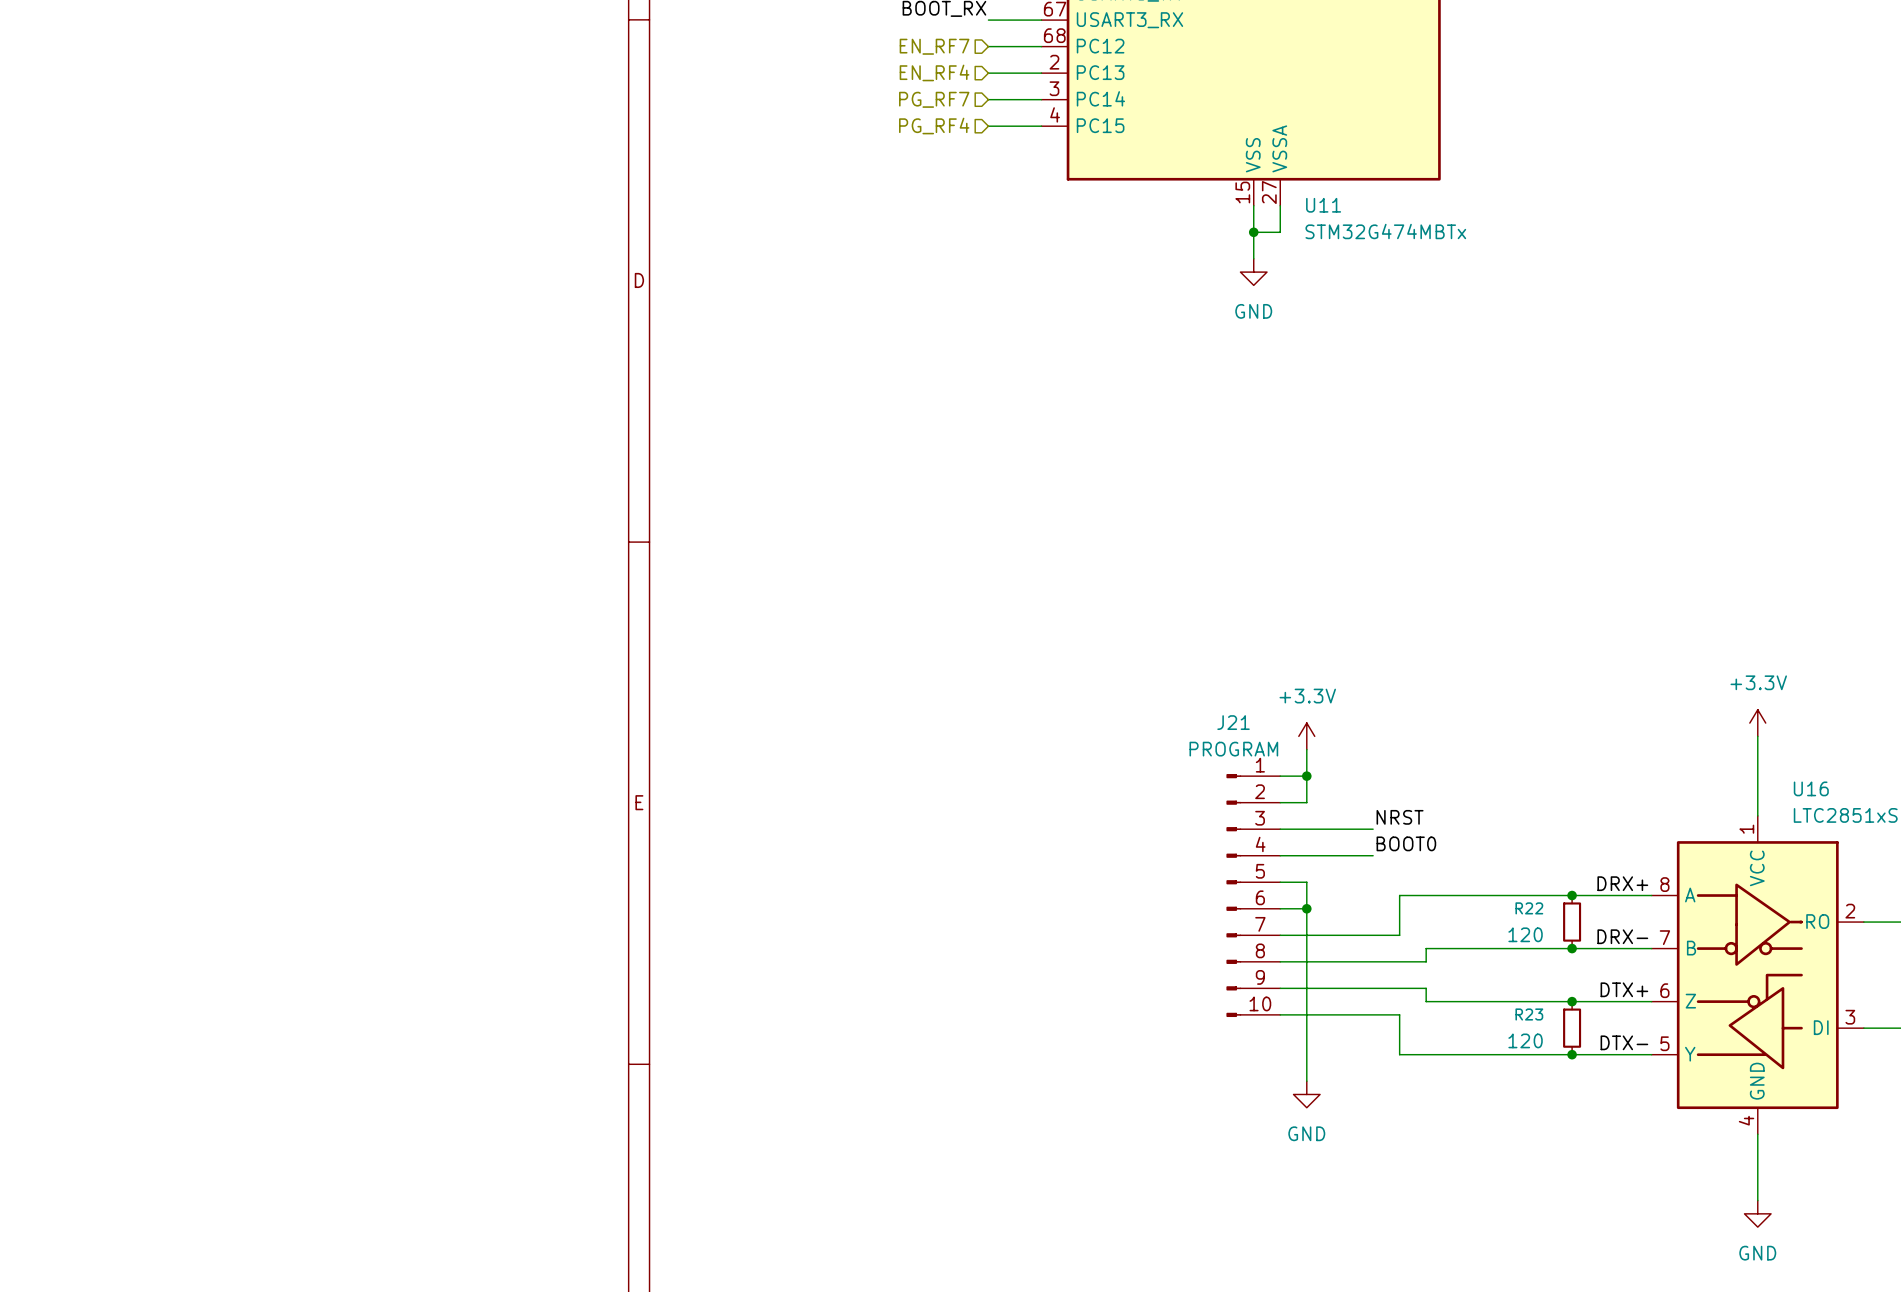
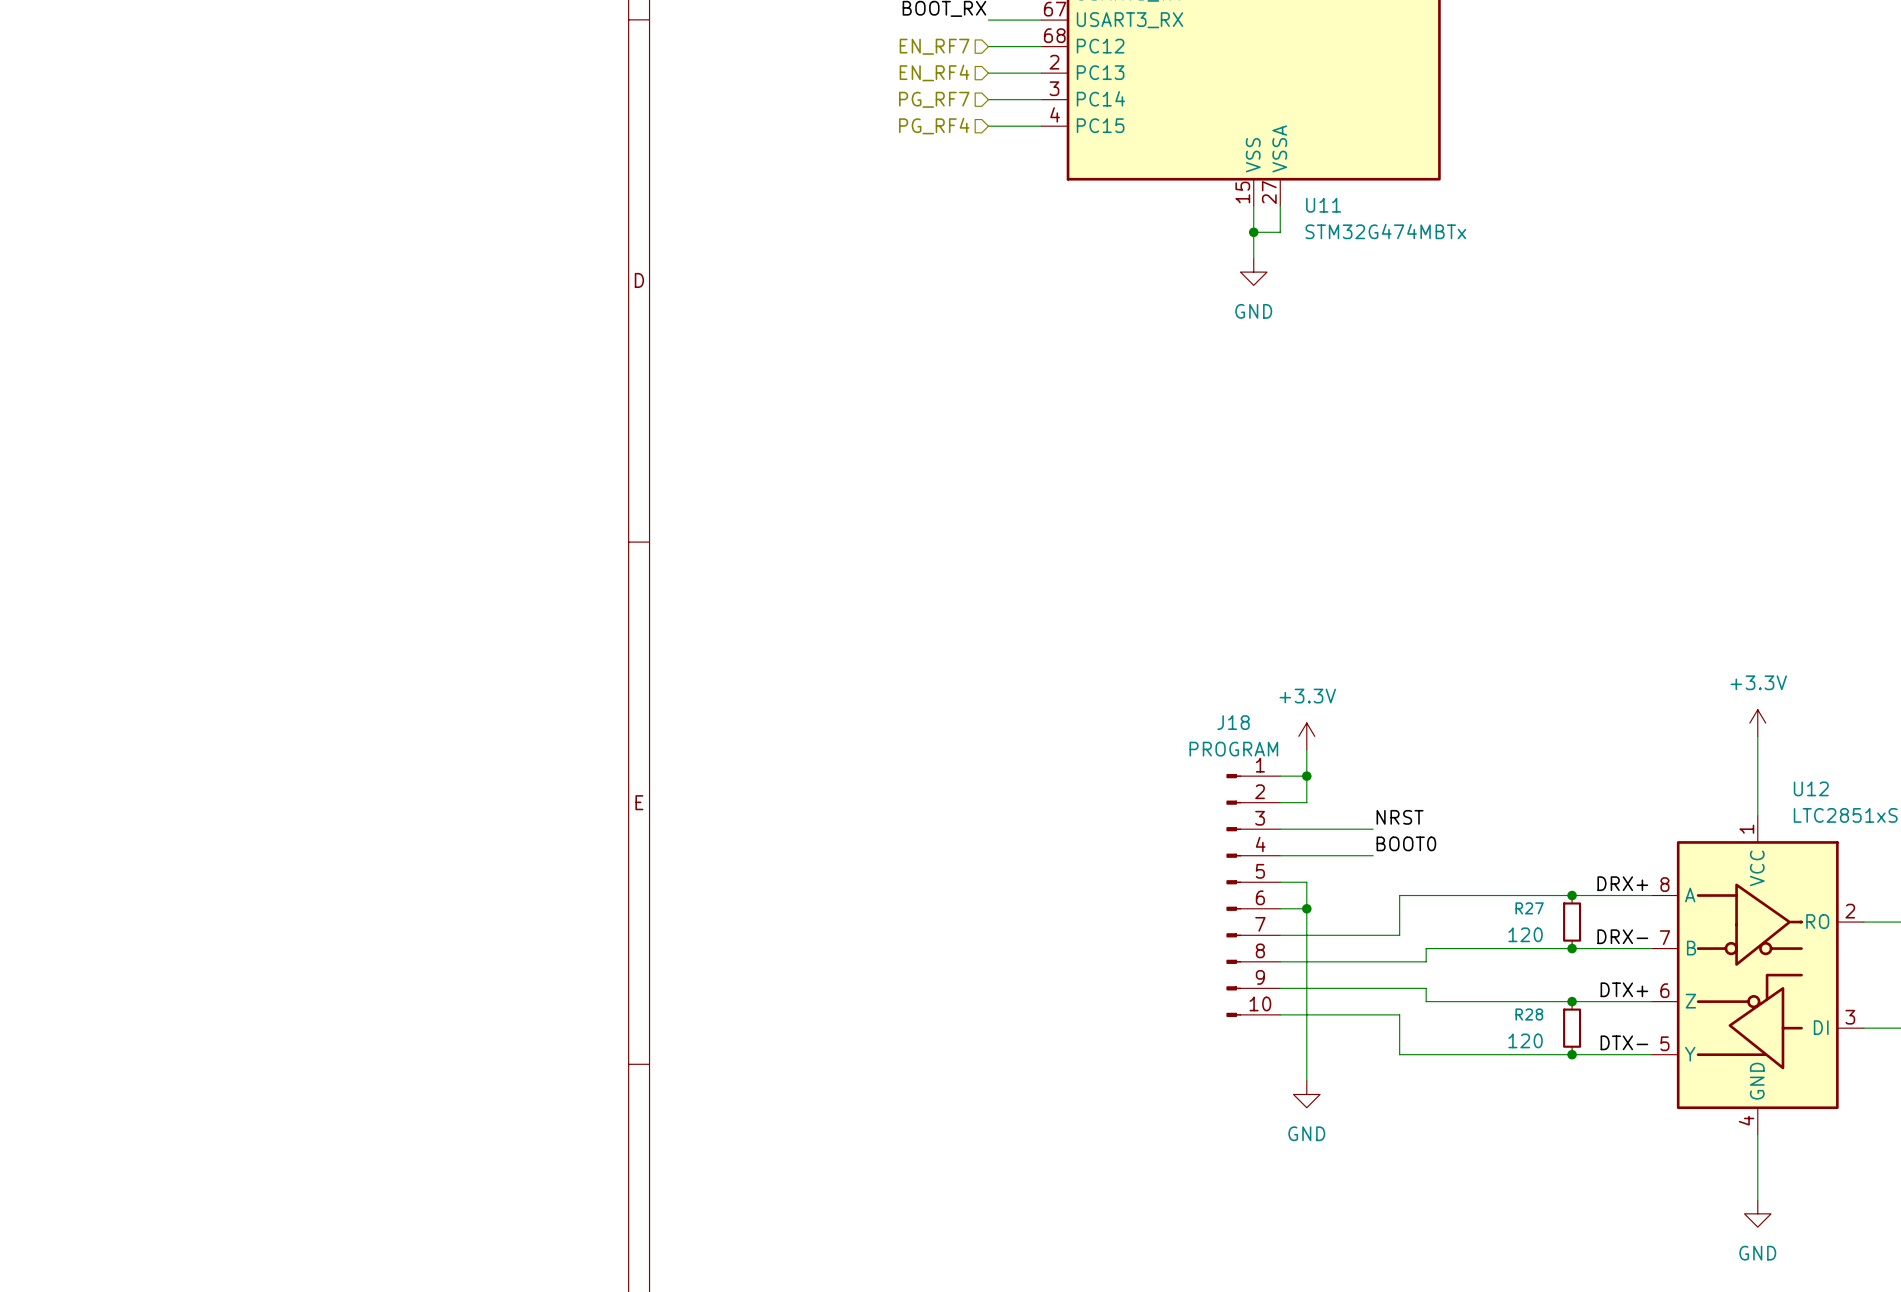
J21 name: J21 (1233, 722) -> J18 (1233, 722)
U16 name: U16 (1811, 788) -> U12 (1811, 788)
R22 name: R22 (1529, 908) -> R27 (1529, 908)
R23 name: R23 (1529, 1014) -> R28 (1529, 1014)

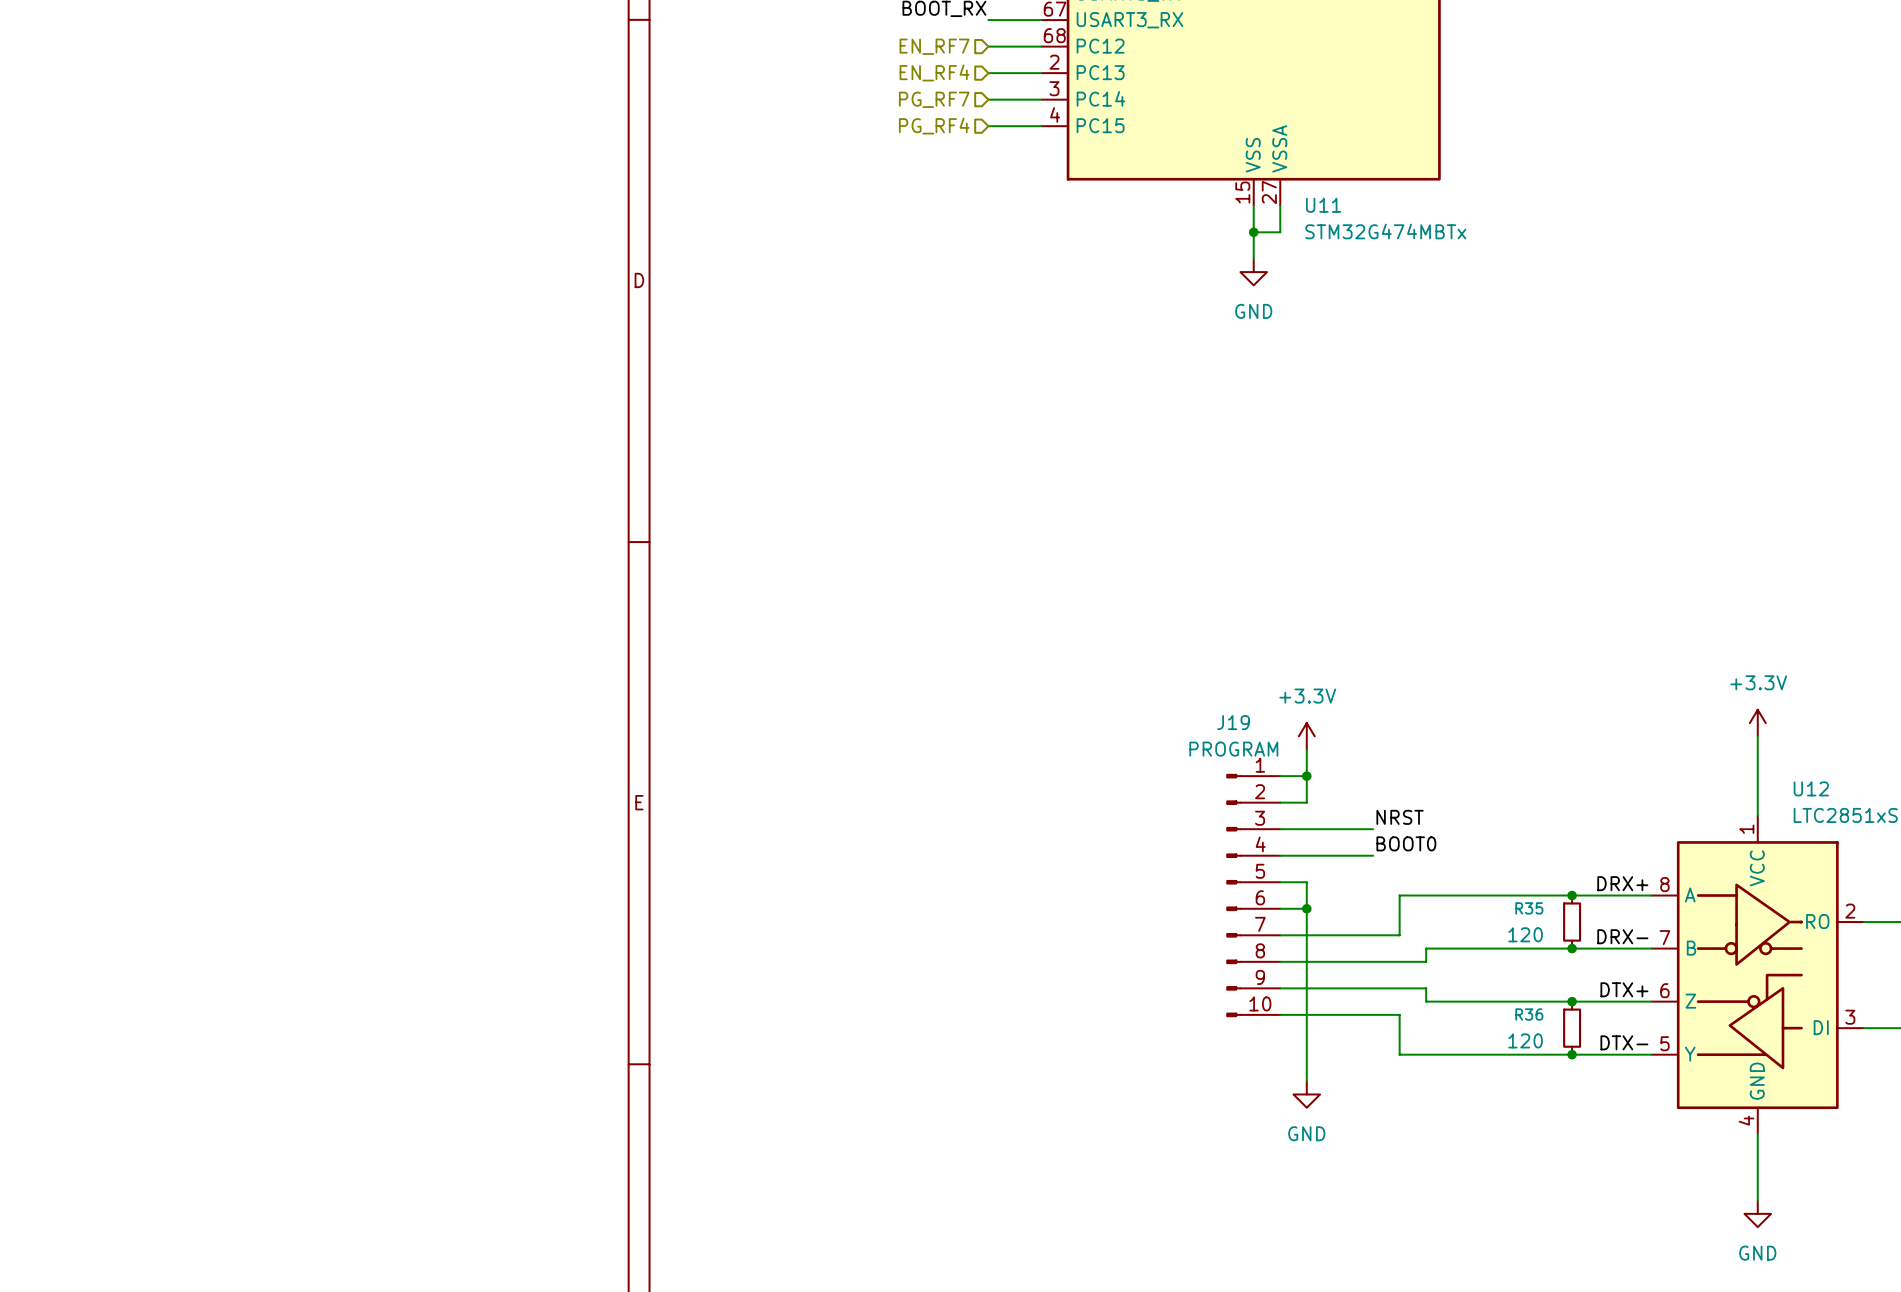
J18 name: J18 (1233, 722) -> J19 (1233, 722)
R27 name: R27 (1529, 908) -> R35 (1529, 908)
R28 name: R28 (1529, 1014) -> R36 (1529, 1014)

